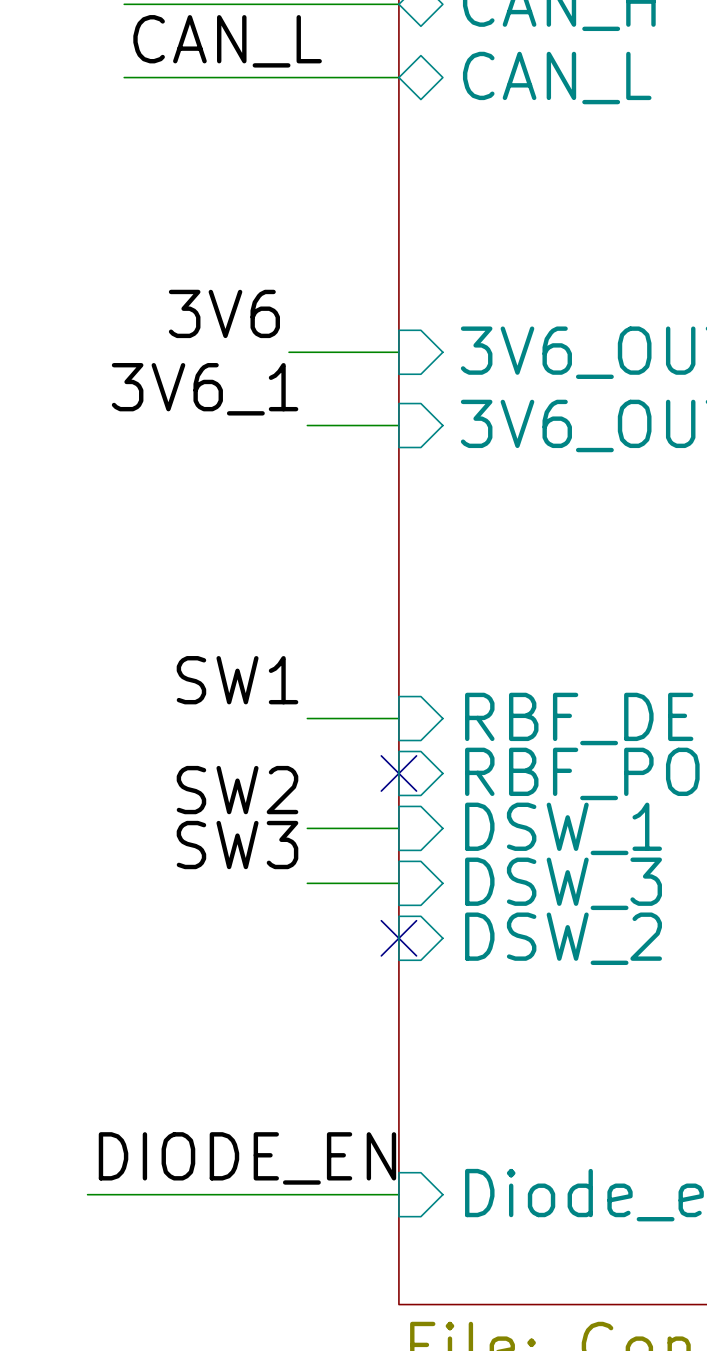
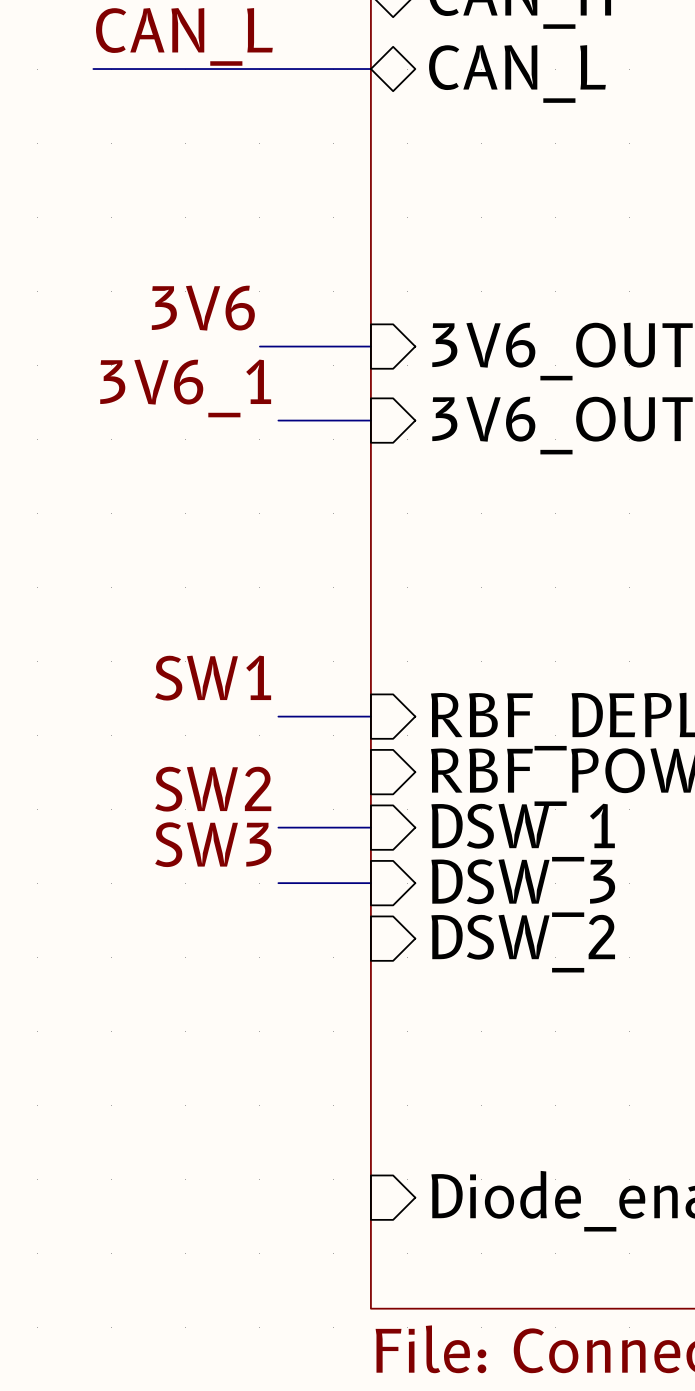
no-connect mark: (398, 773) -> none
no-connect mark: (398, 938) -> none
label: DIODE_EN (247, 1158) -> none
wire: (87, 1194) (398, 1194) -> none

